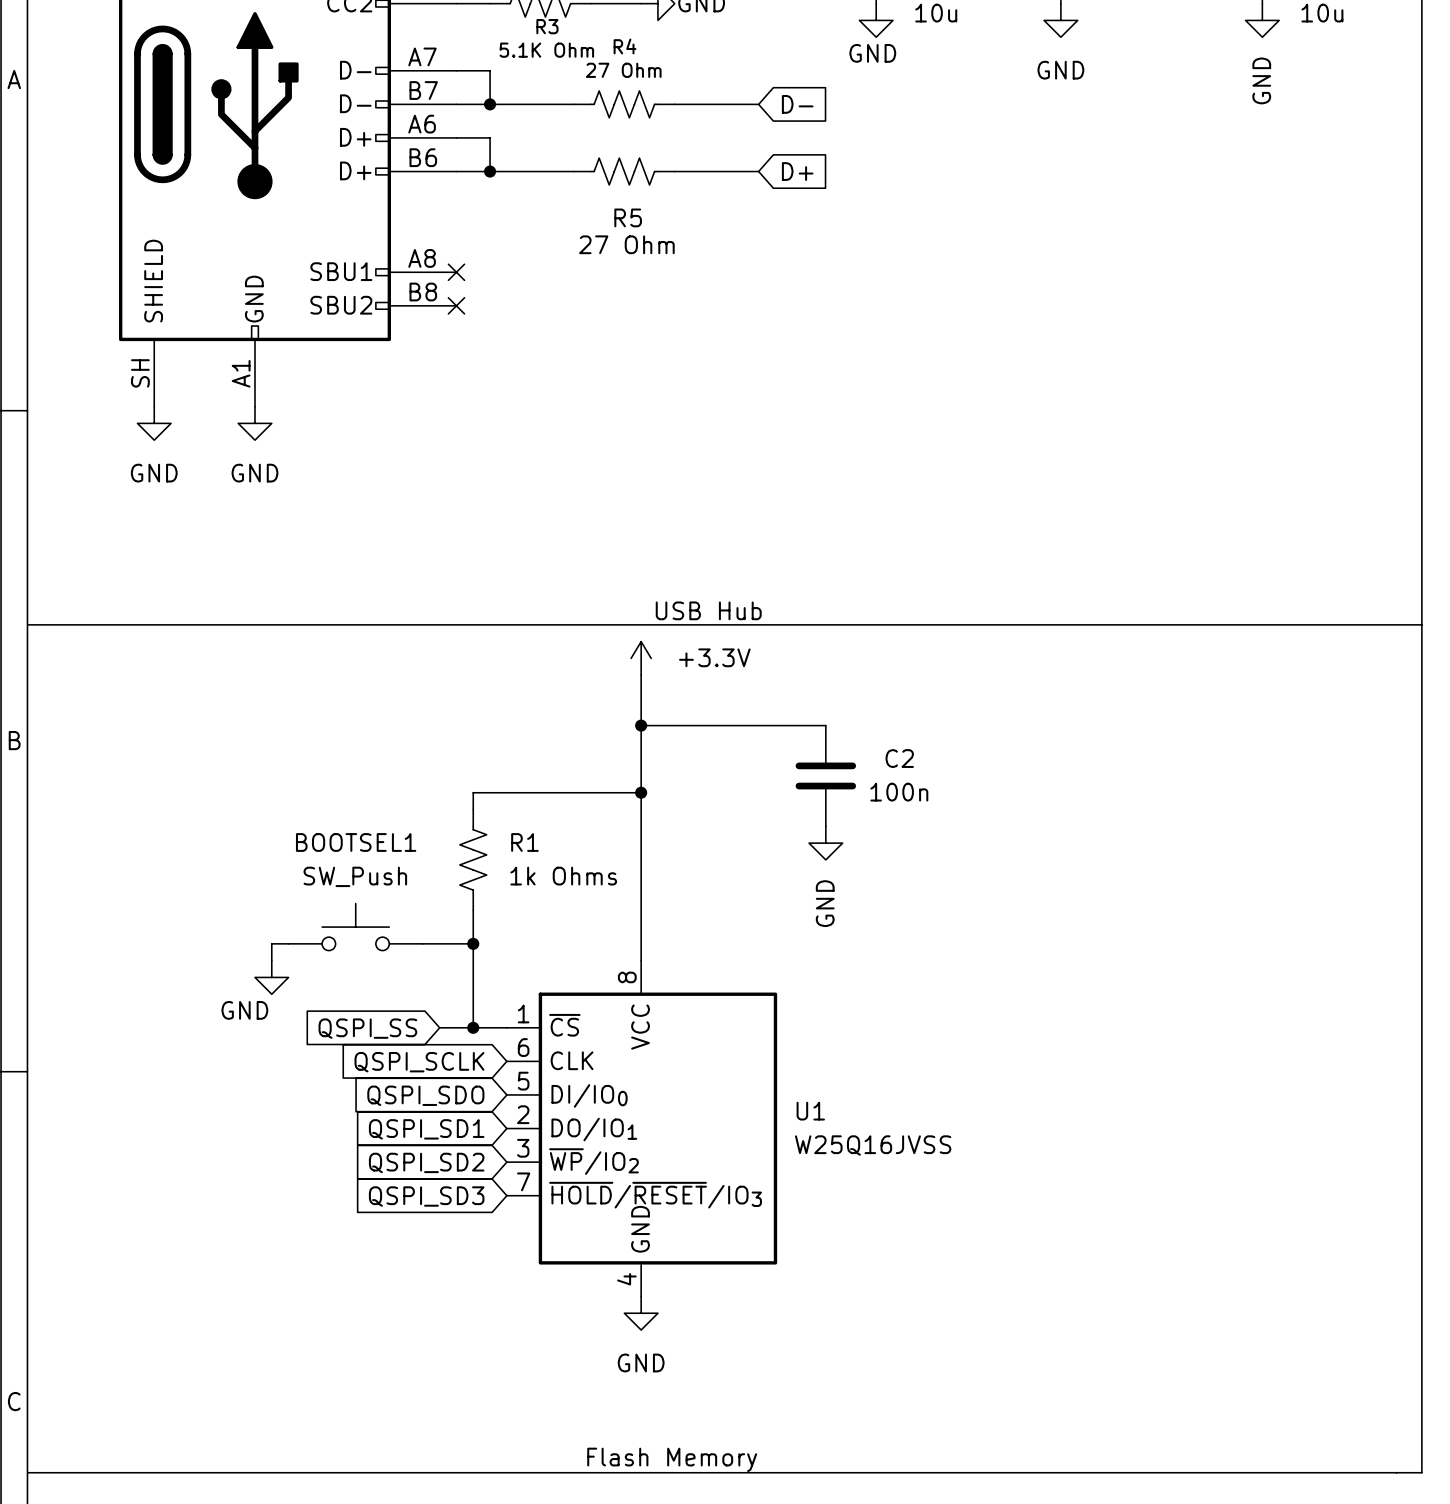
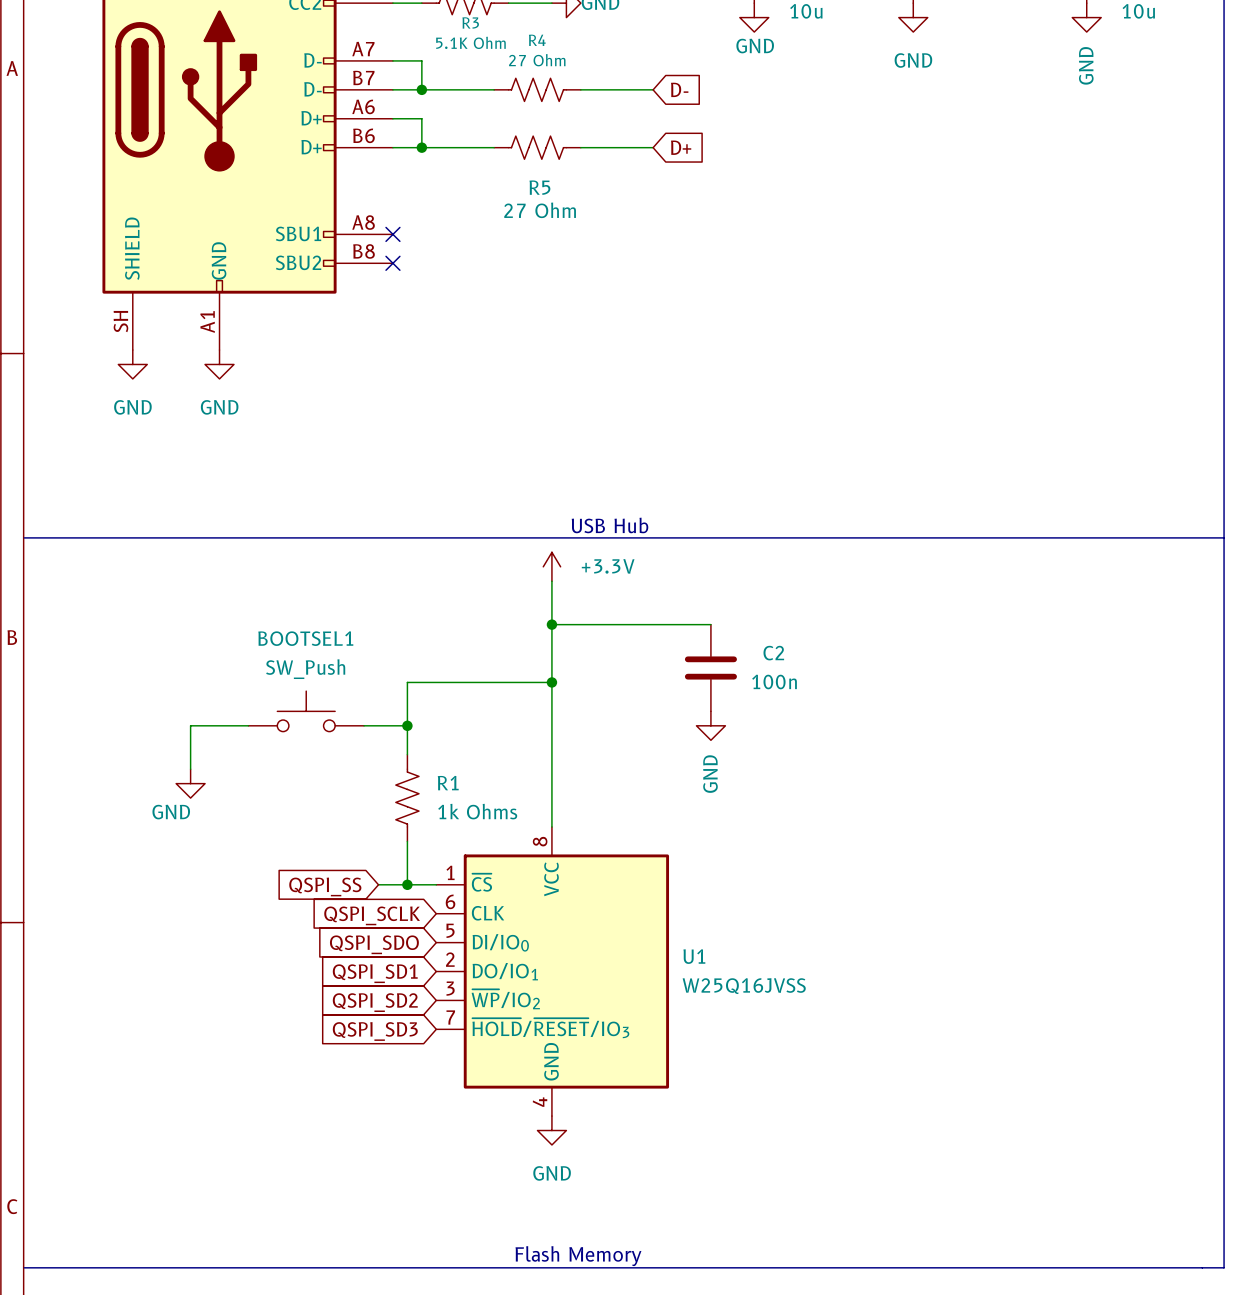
wire: none -> (248, 725) (190, 725) (190, 769)
junction: none -> (407, 725)
R1 position: (473, 859) -> (407, 798)
wire: (473, 910) (473, 977) -> (407, 696) (407, 754)
BOOTSEL1 position: (355, 927) -> (306, 711)
wire: (288, 943) (271, 943) (271, 960) -> none
wire: (422, 943) (473, 943) -> (364, 725) (407, 725)
junction: (473, 943) -> none
power symbol position: GND (271, 977) -> GND (190, 783)

